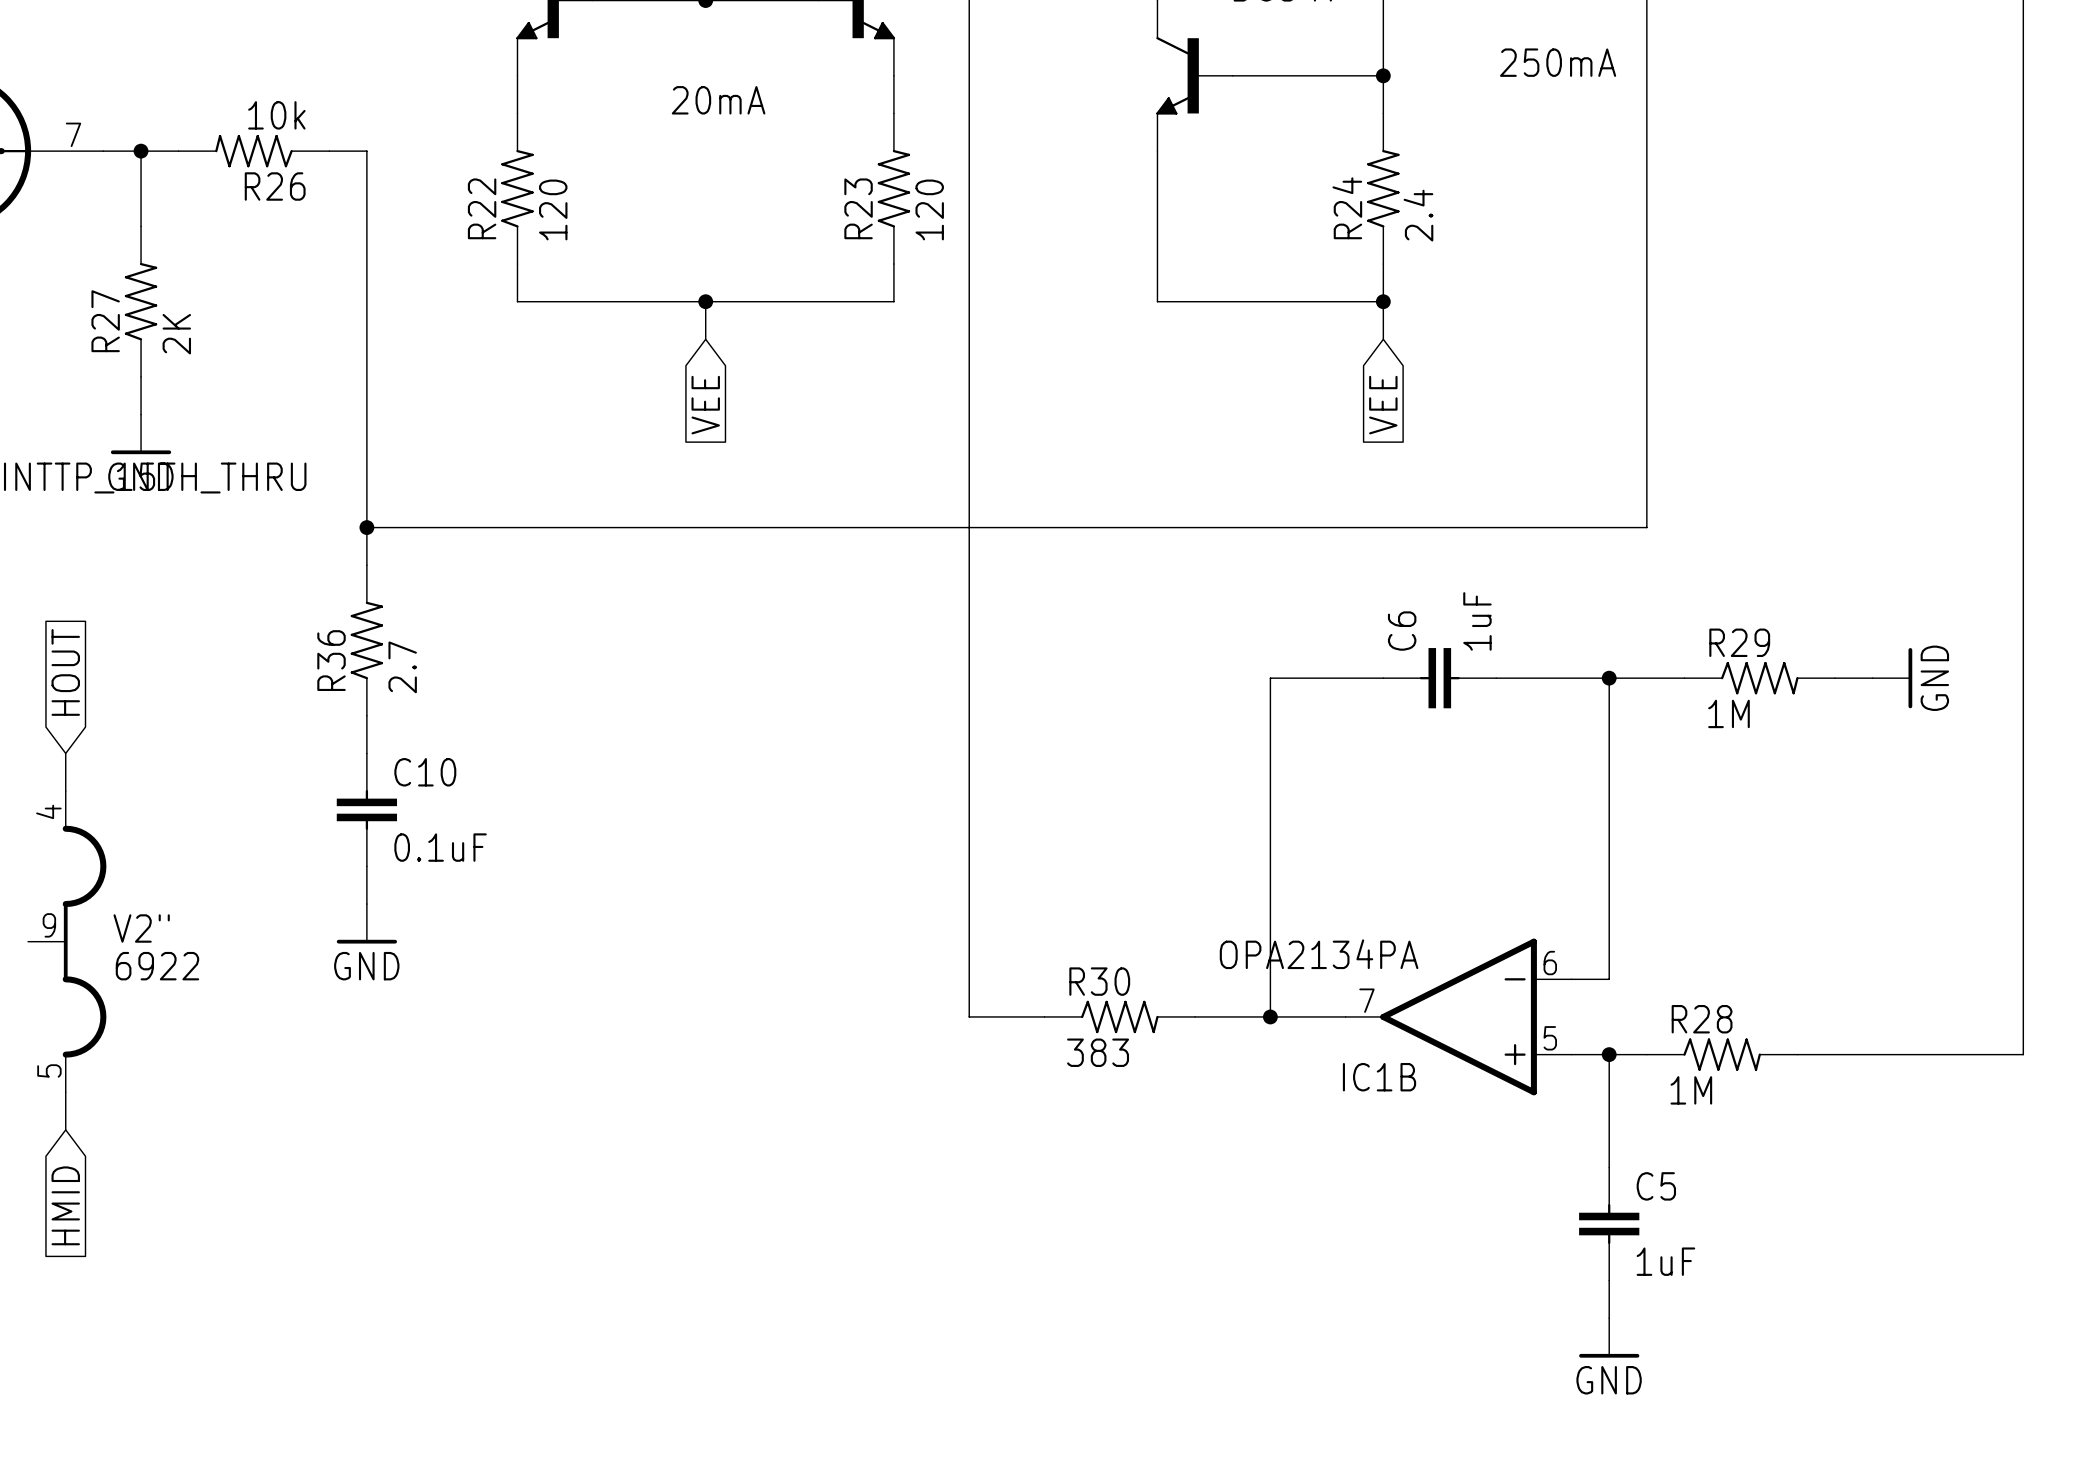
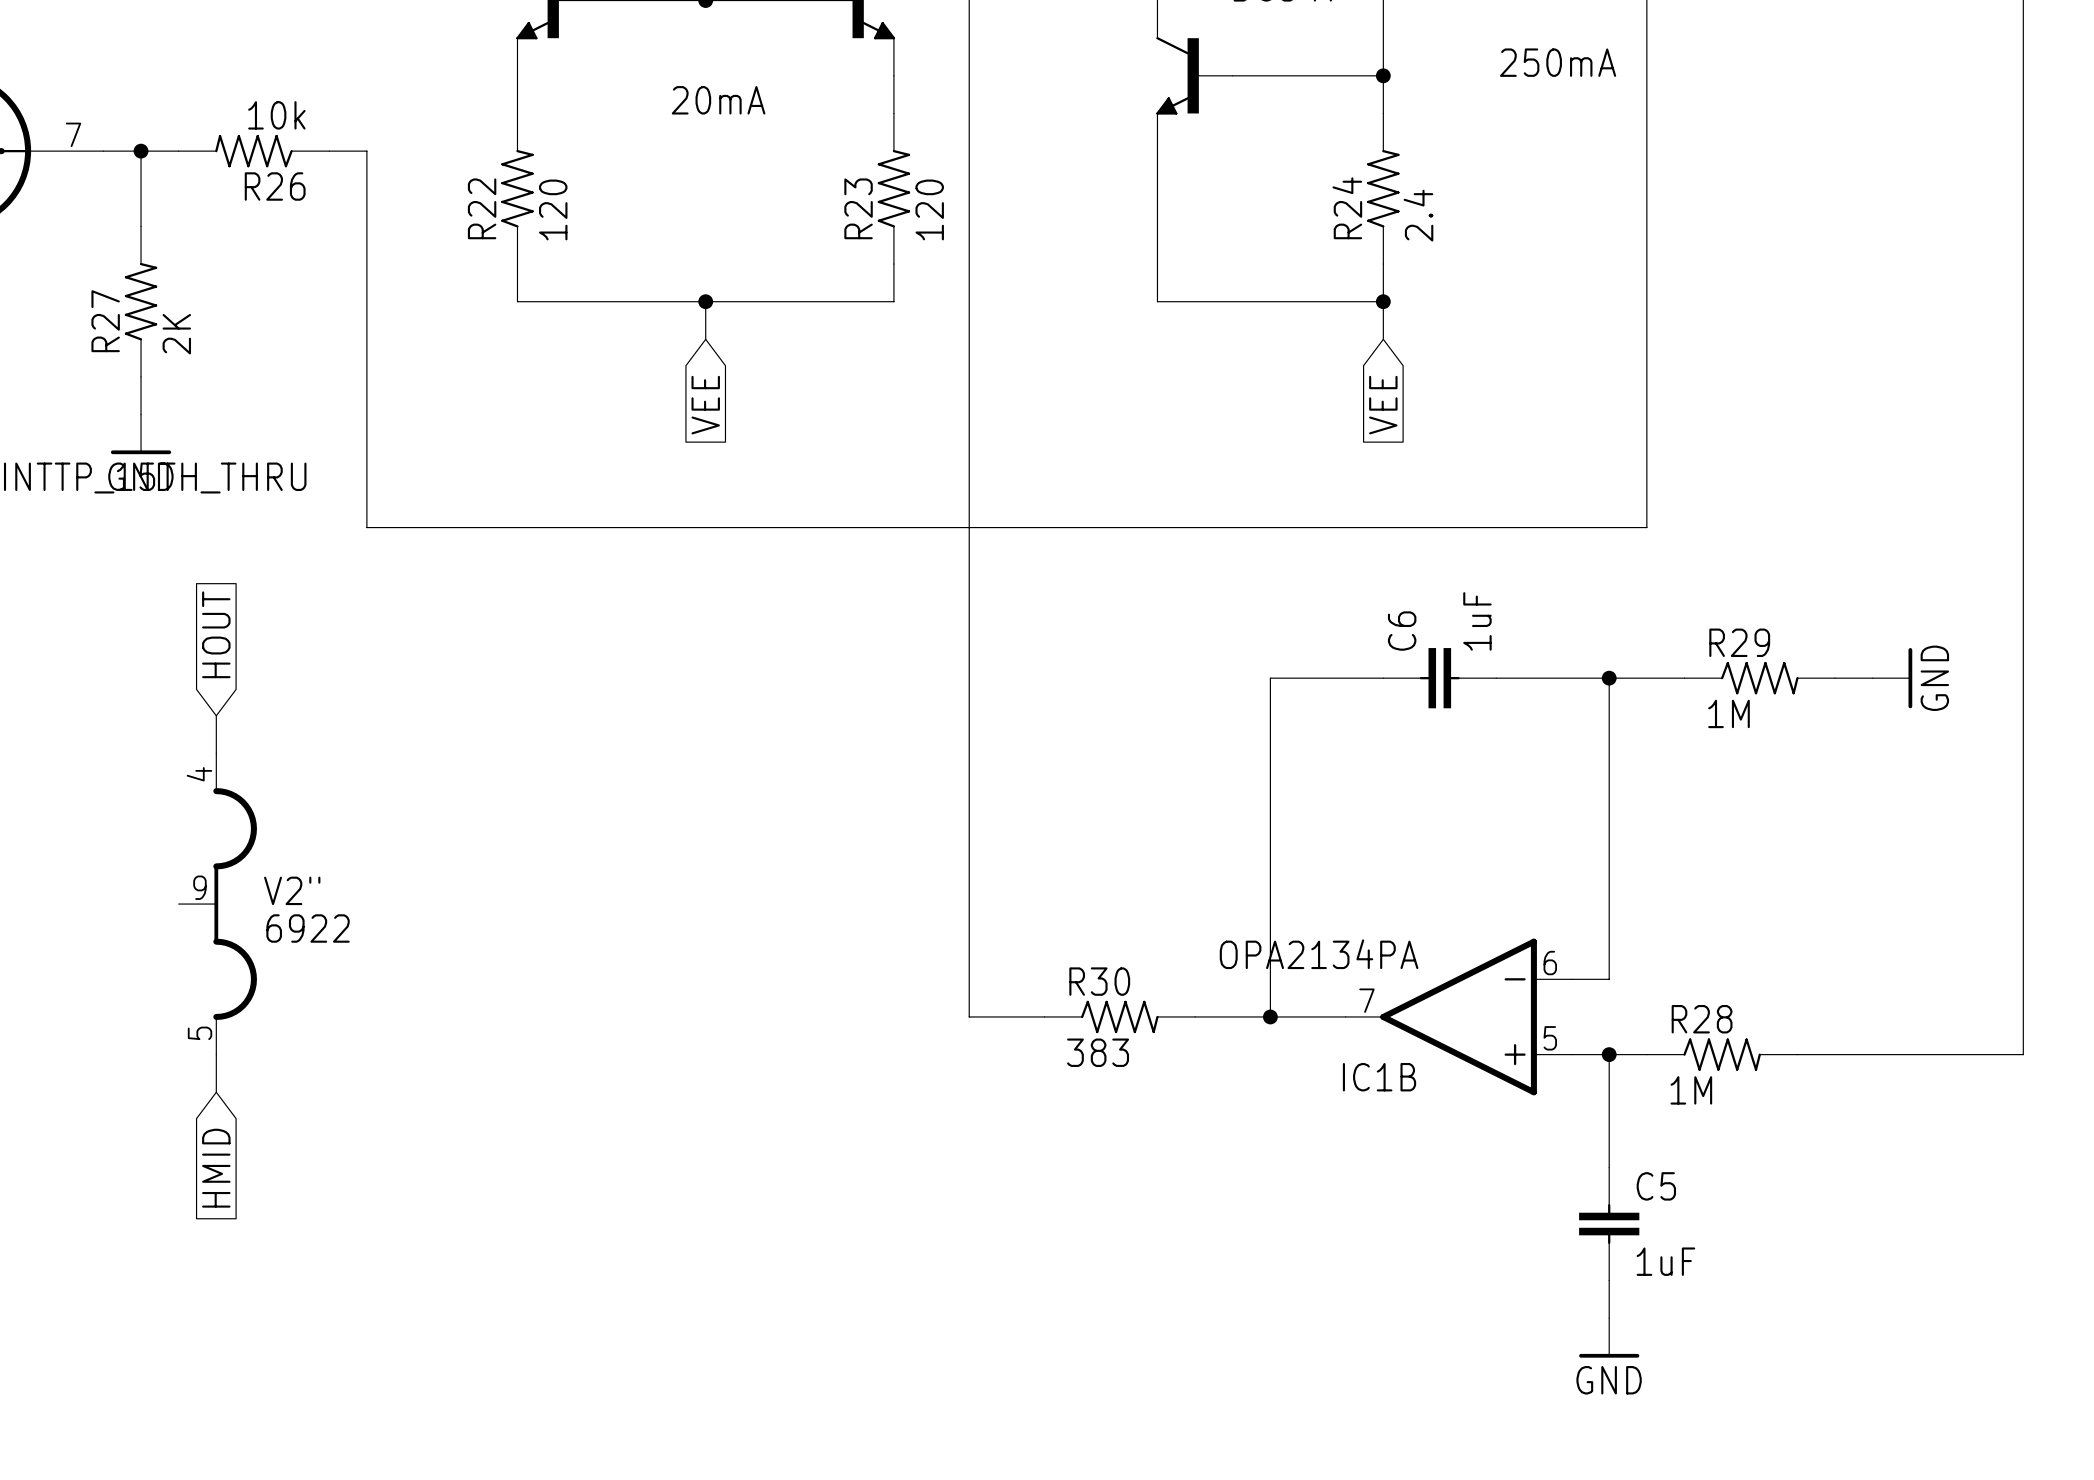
wire: (366, 527) (366, 565) -> none
junction: (366, 527) -> none
R36: 2.7 (366, 640) -> none
global label position: HOUT (65, 672) -> HOUT (216, 634)
wire: (366, 715) (366, 753) -> (216, 715) (216, 753)
wire: (65, 753) (65, 791) -> none
C10: 0.1uF (366, 809) -> none
wire: (366, 866) (366, 904) -> none
power symbol: GND (366, 923) -> none
V2" position: (67, 941) -> (217, 904)
wire: (65, 1092) (65, 1129) -> (216, 1054) (216, 1092)
global label position: HMID (65, 1205) -> HMID (216, 1168)

